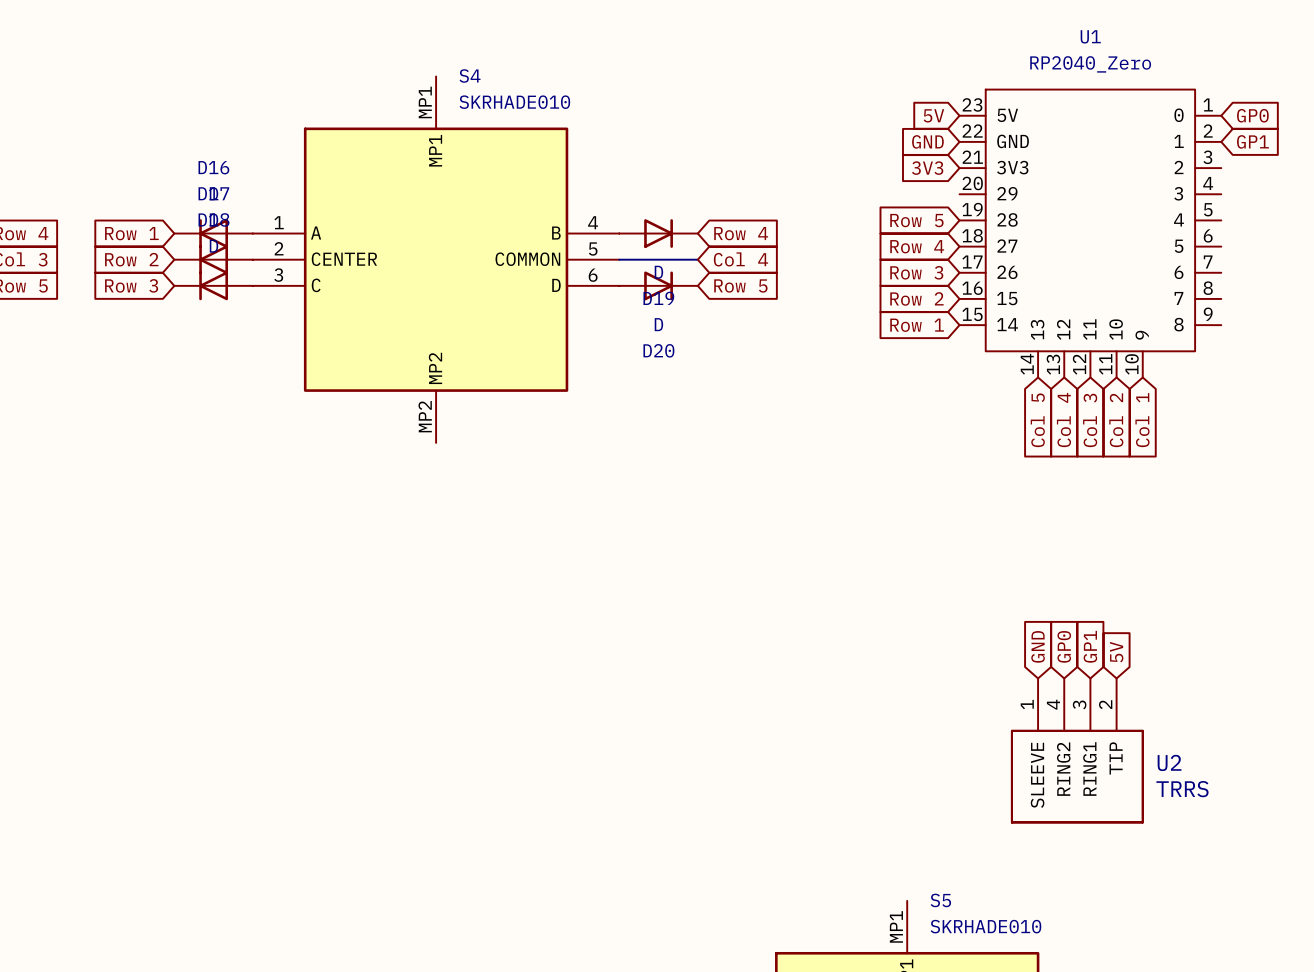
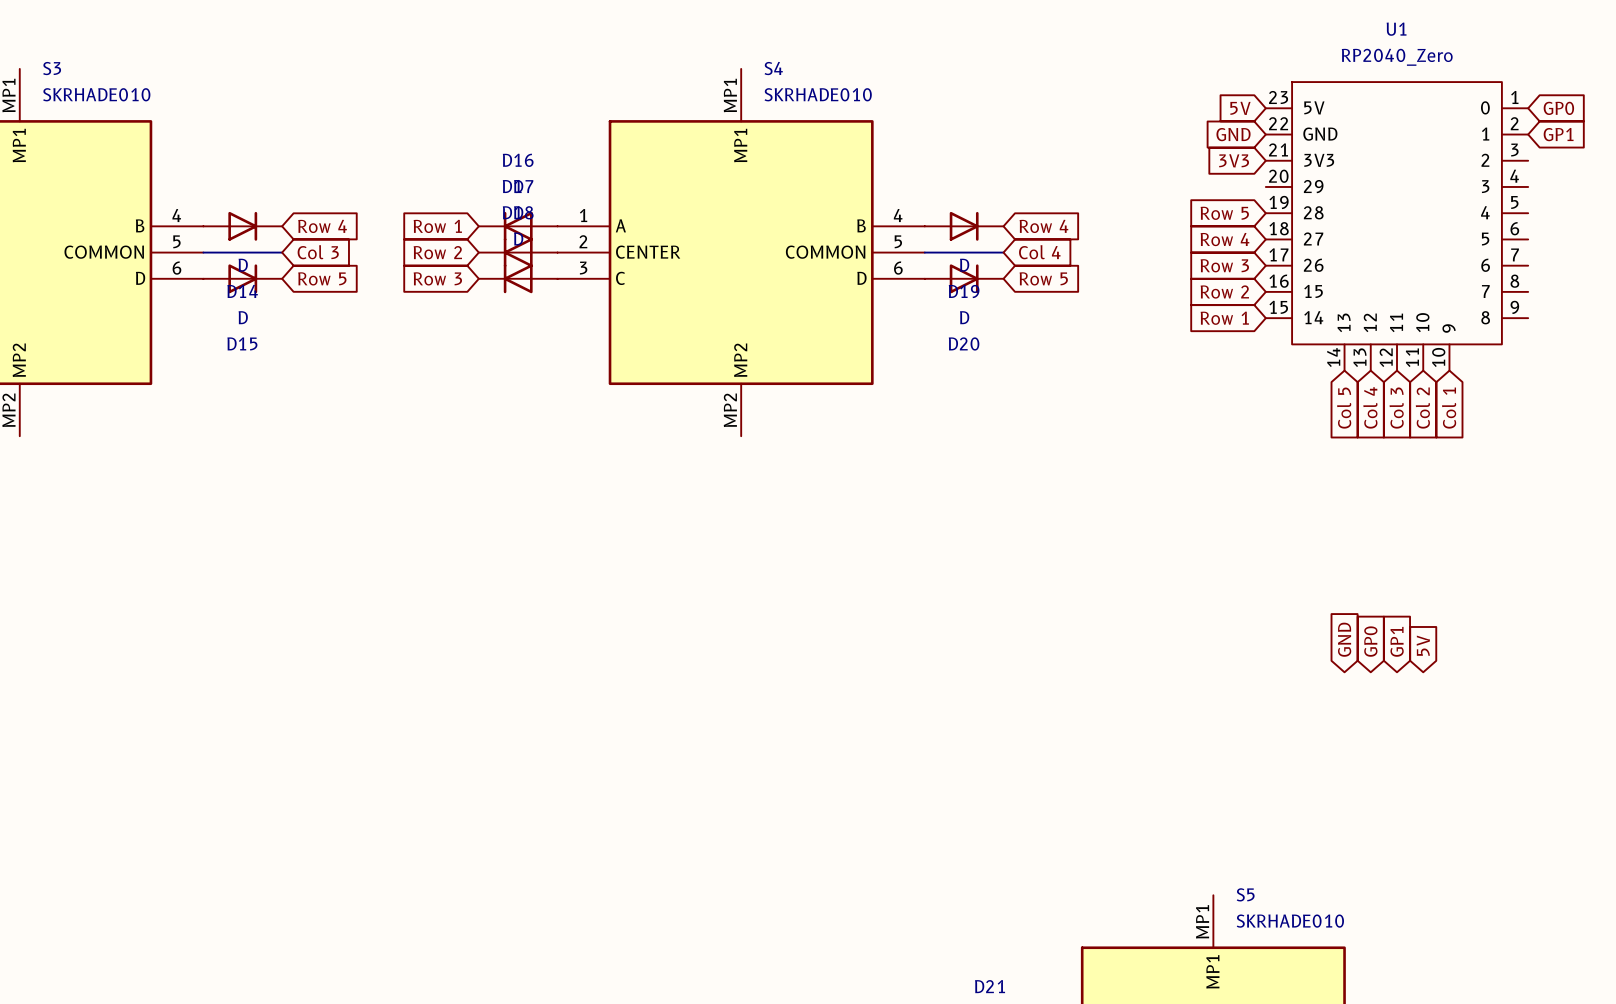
U2: TRRS (1077, 750) -> none

